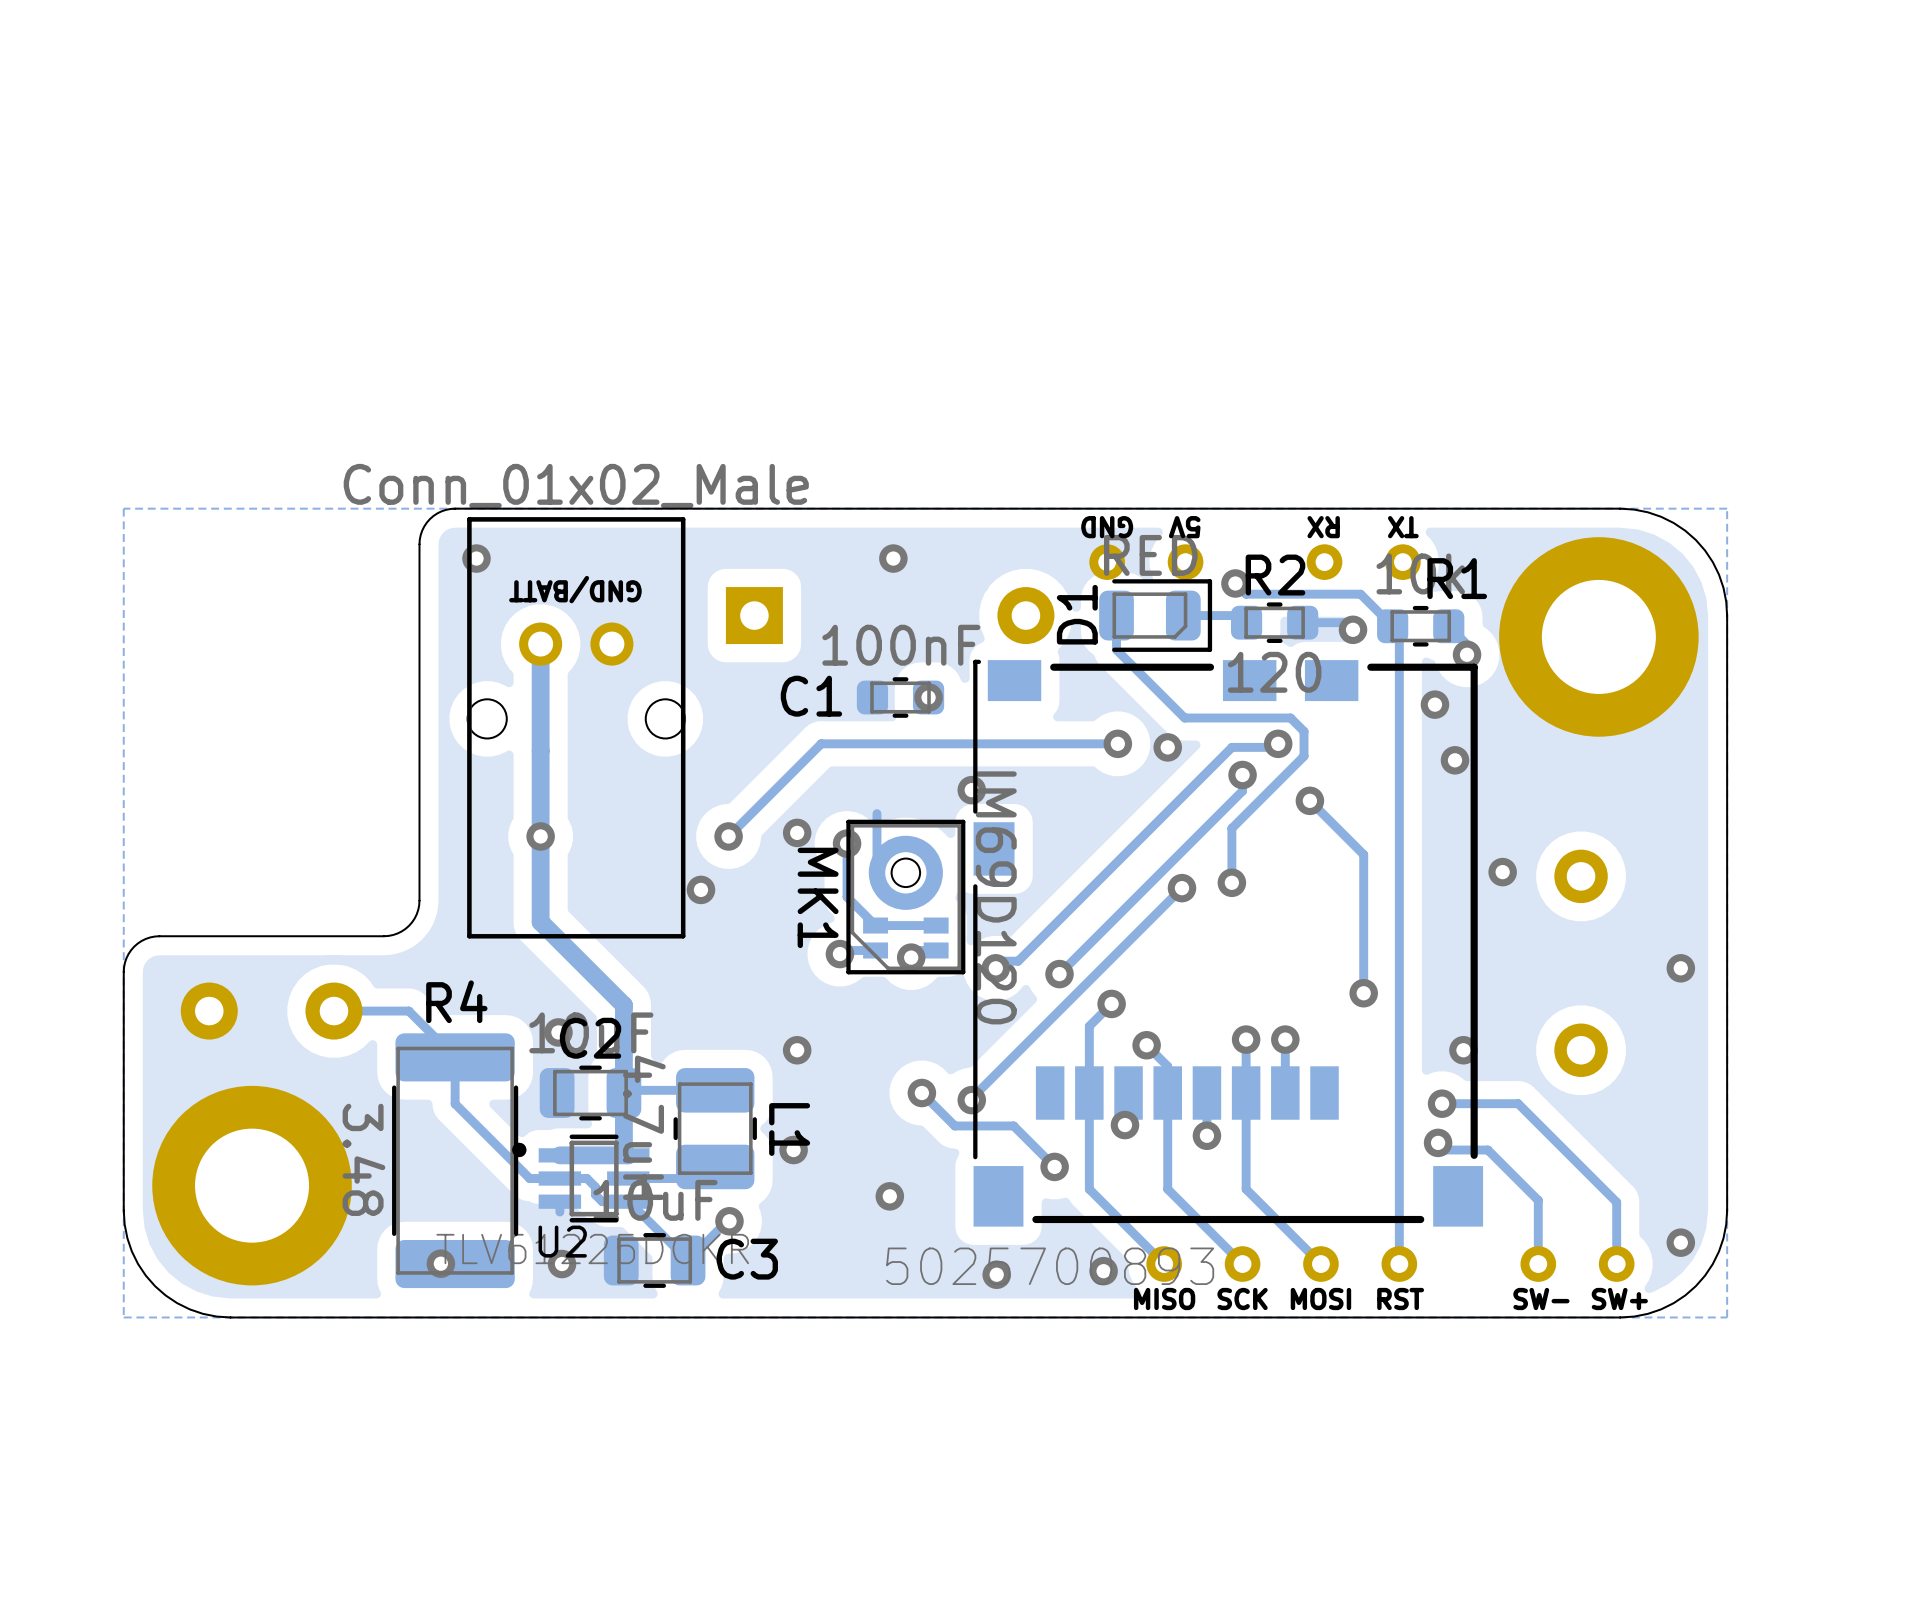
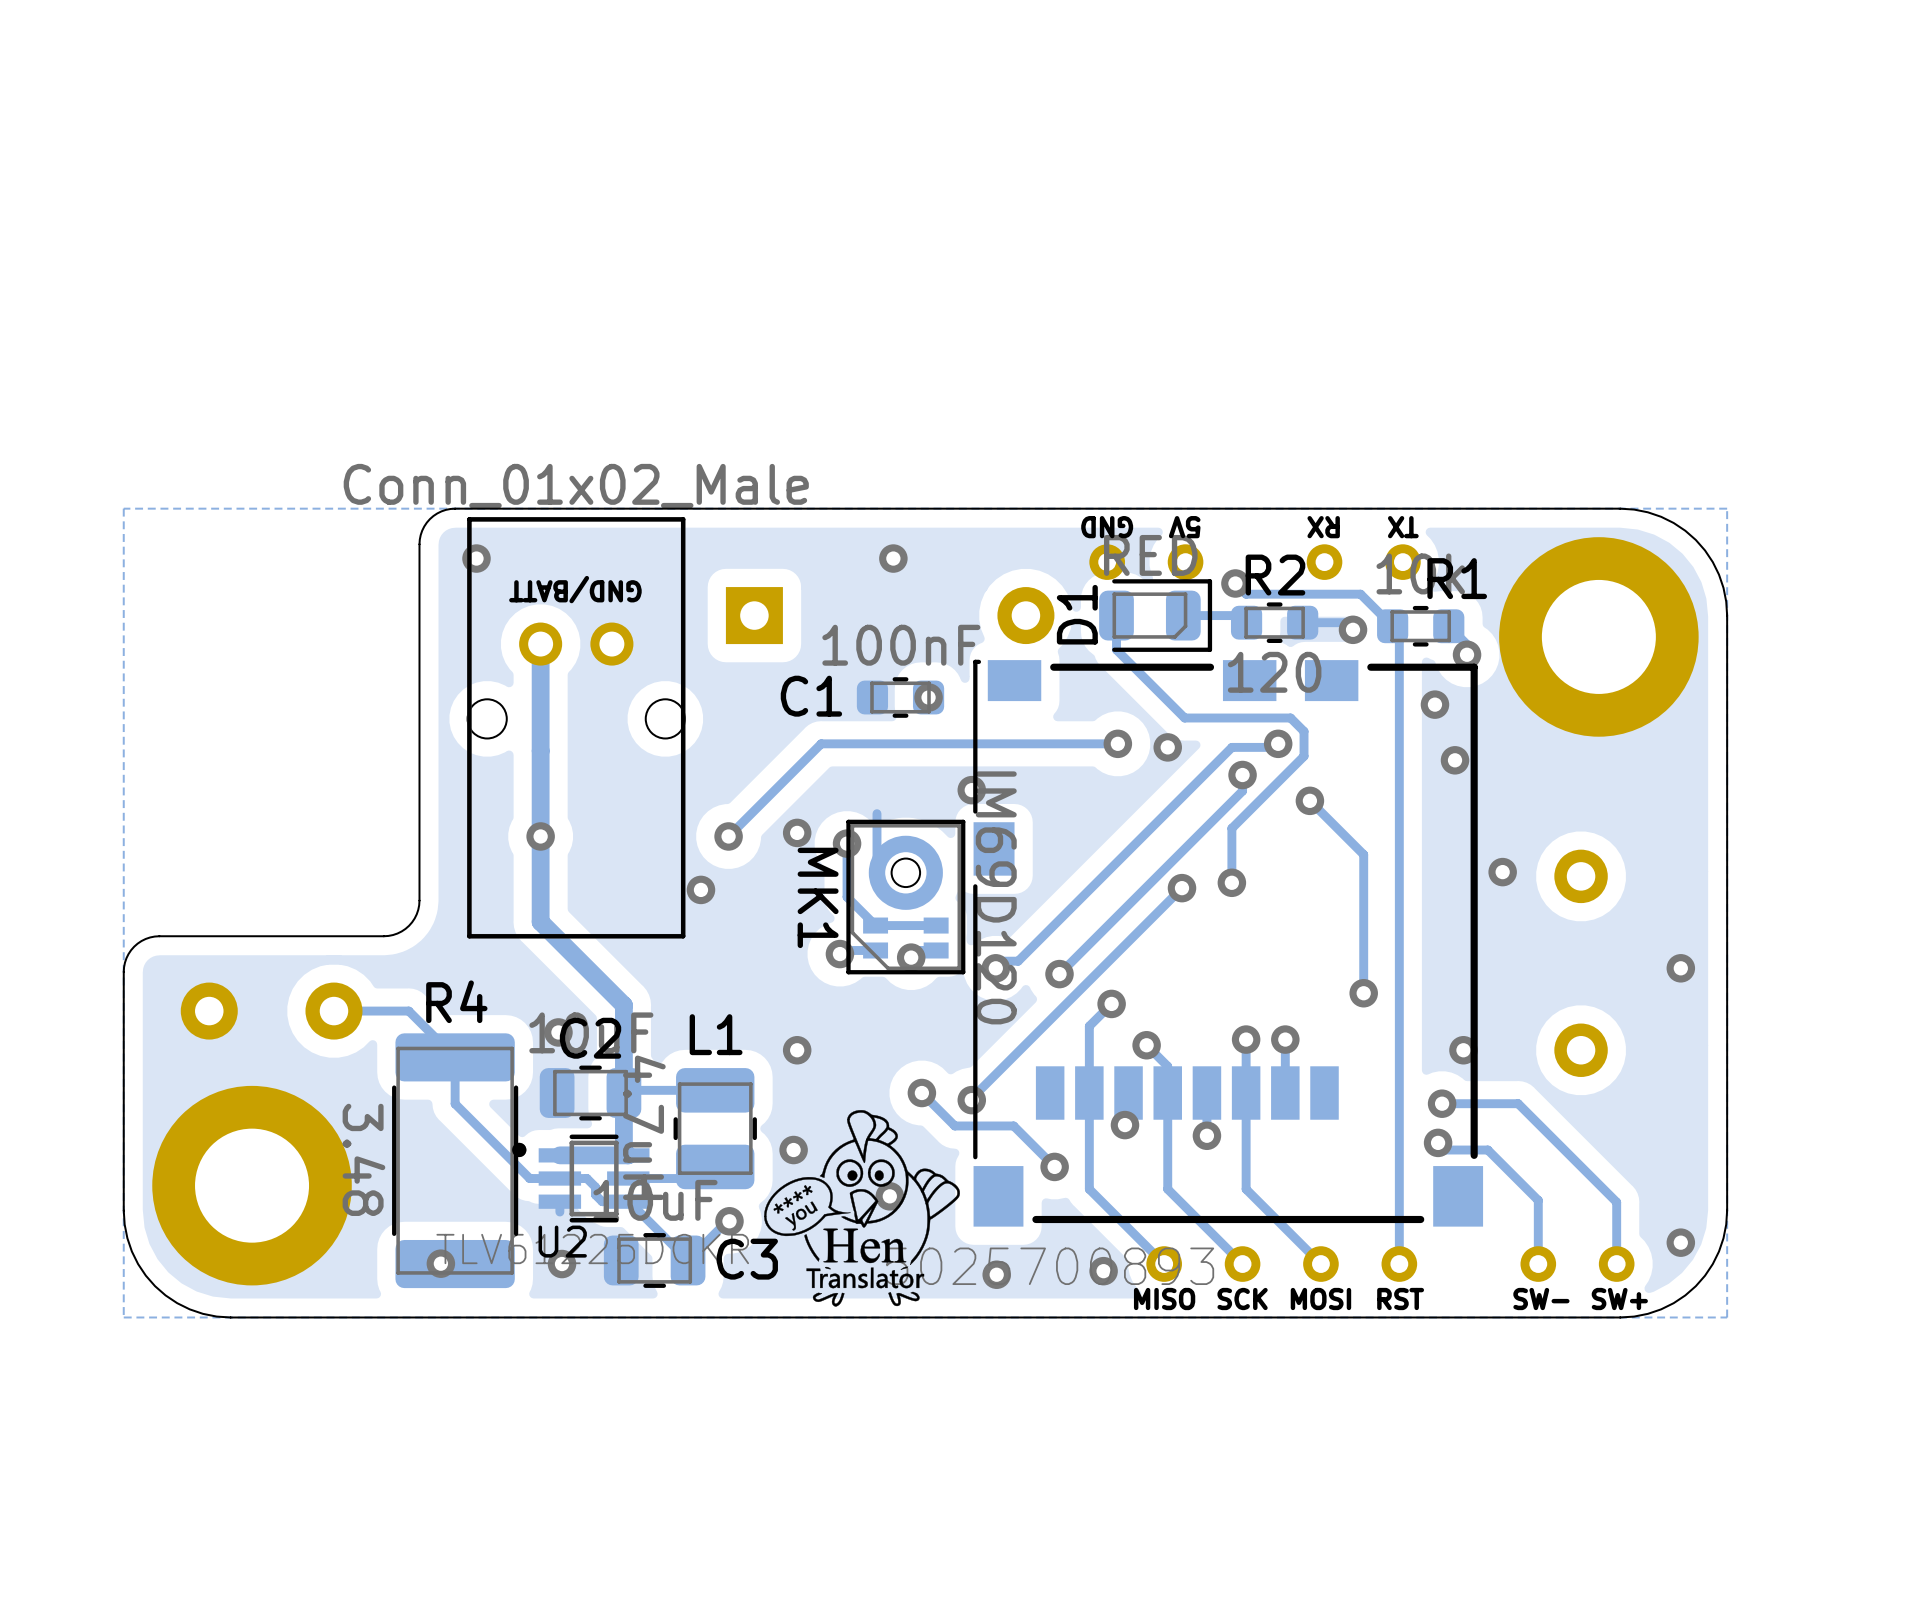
drawing: none -> [764, 1110, 960, 1307]
L1 name rotation: 0° (789, 1129) -> 90° counterclockwise (716, 1034)
L1 name position: L1 (789, 1129) -> L1 (716, 1034)

